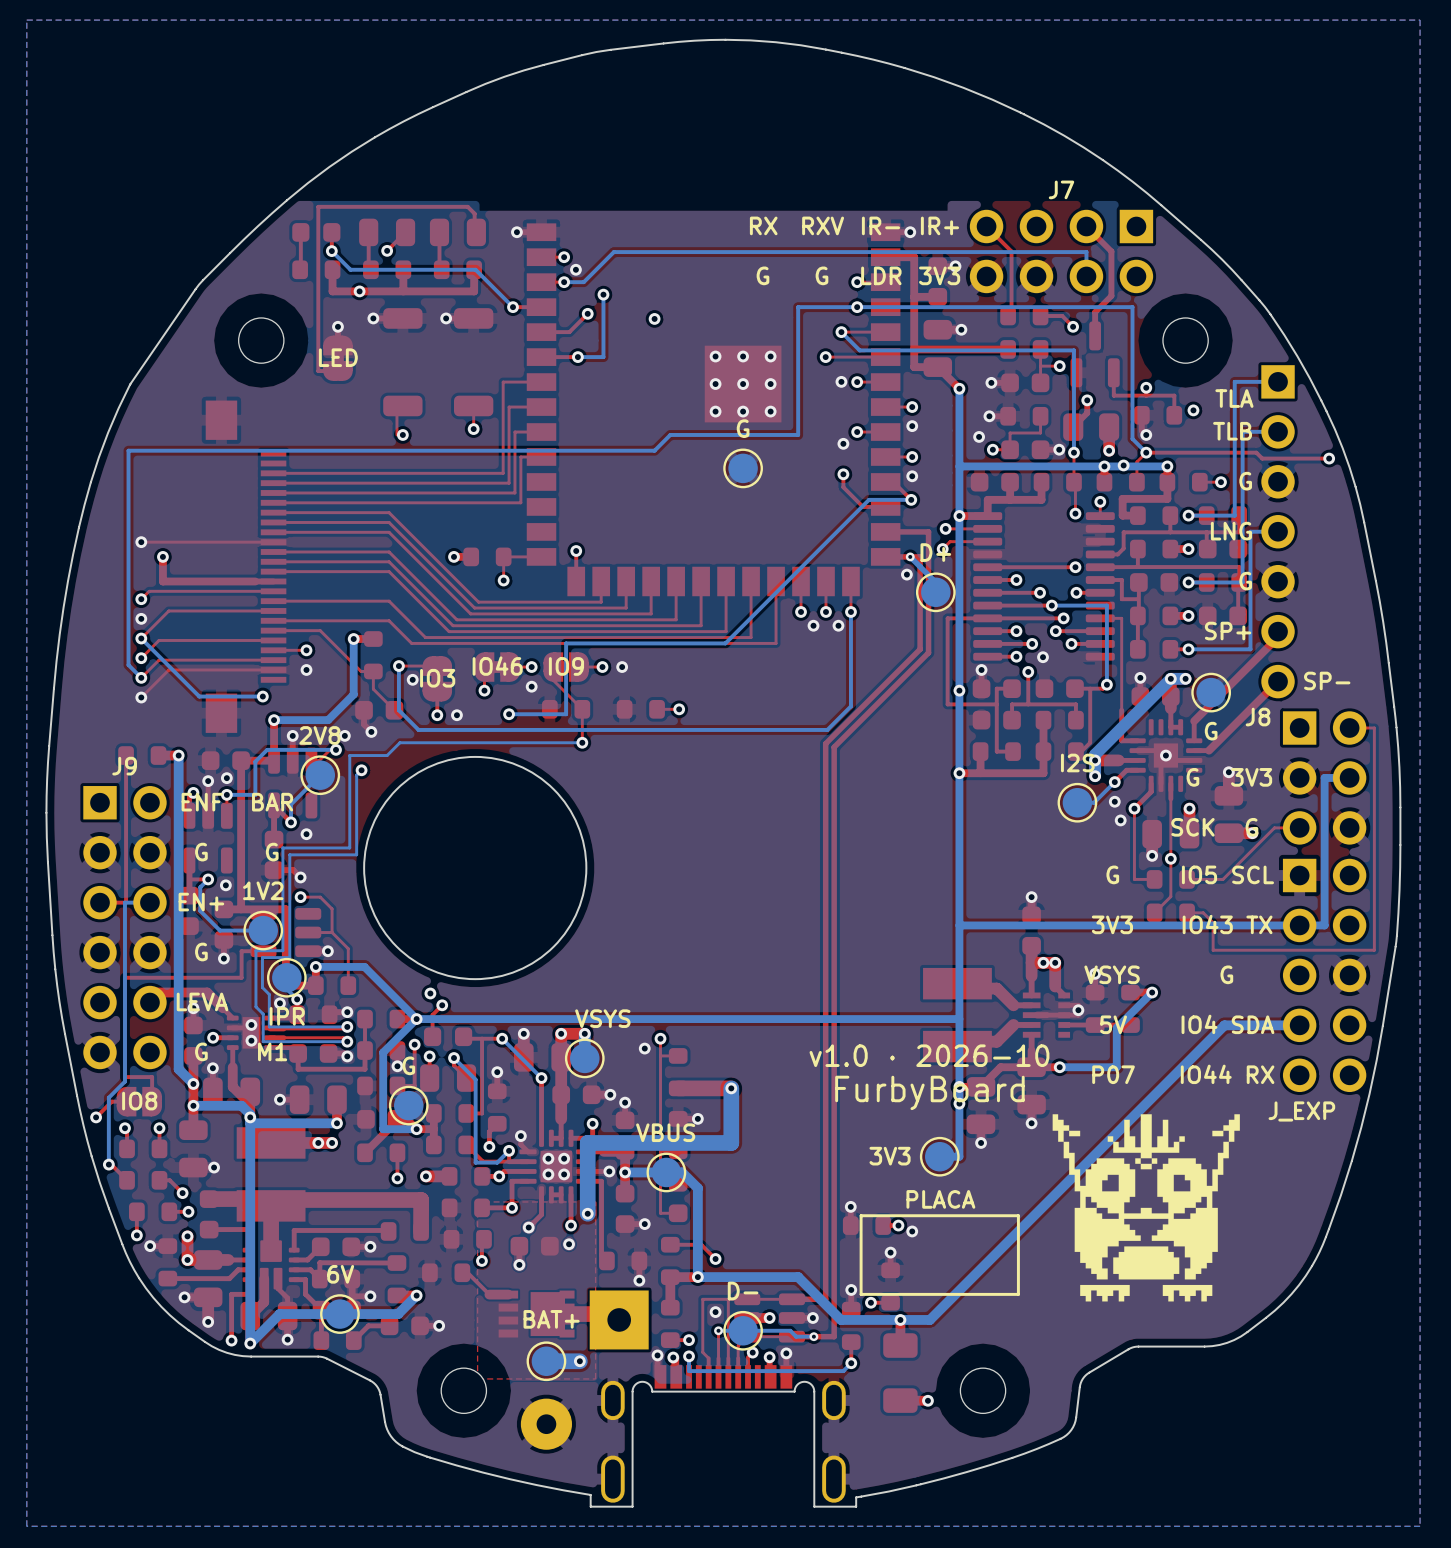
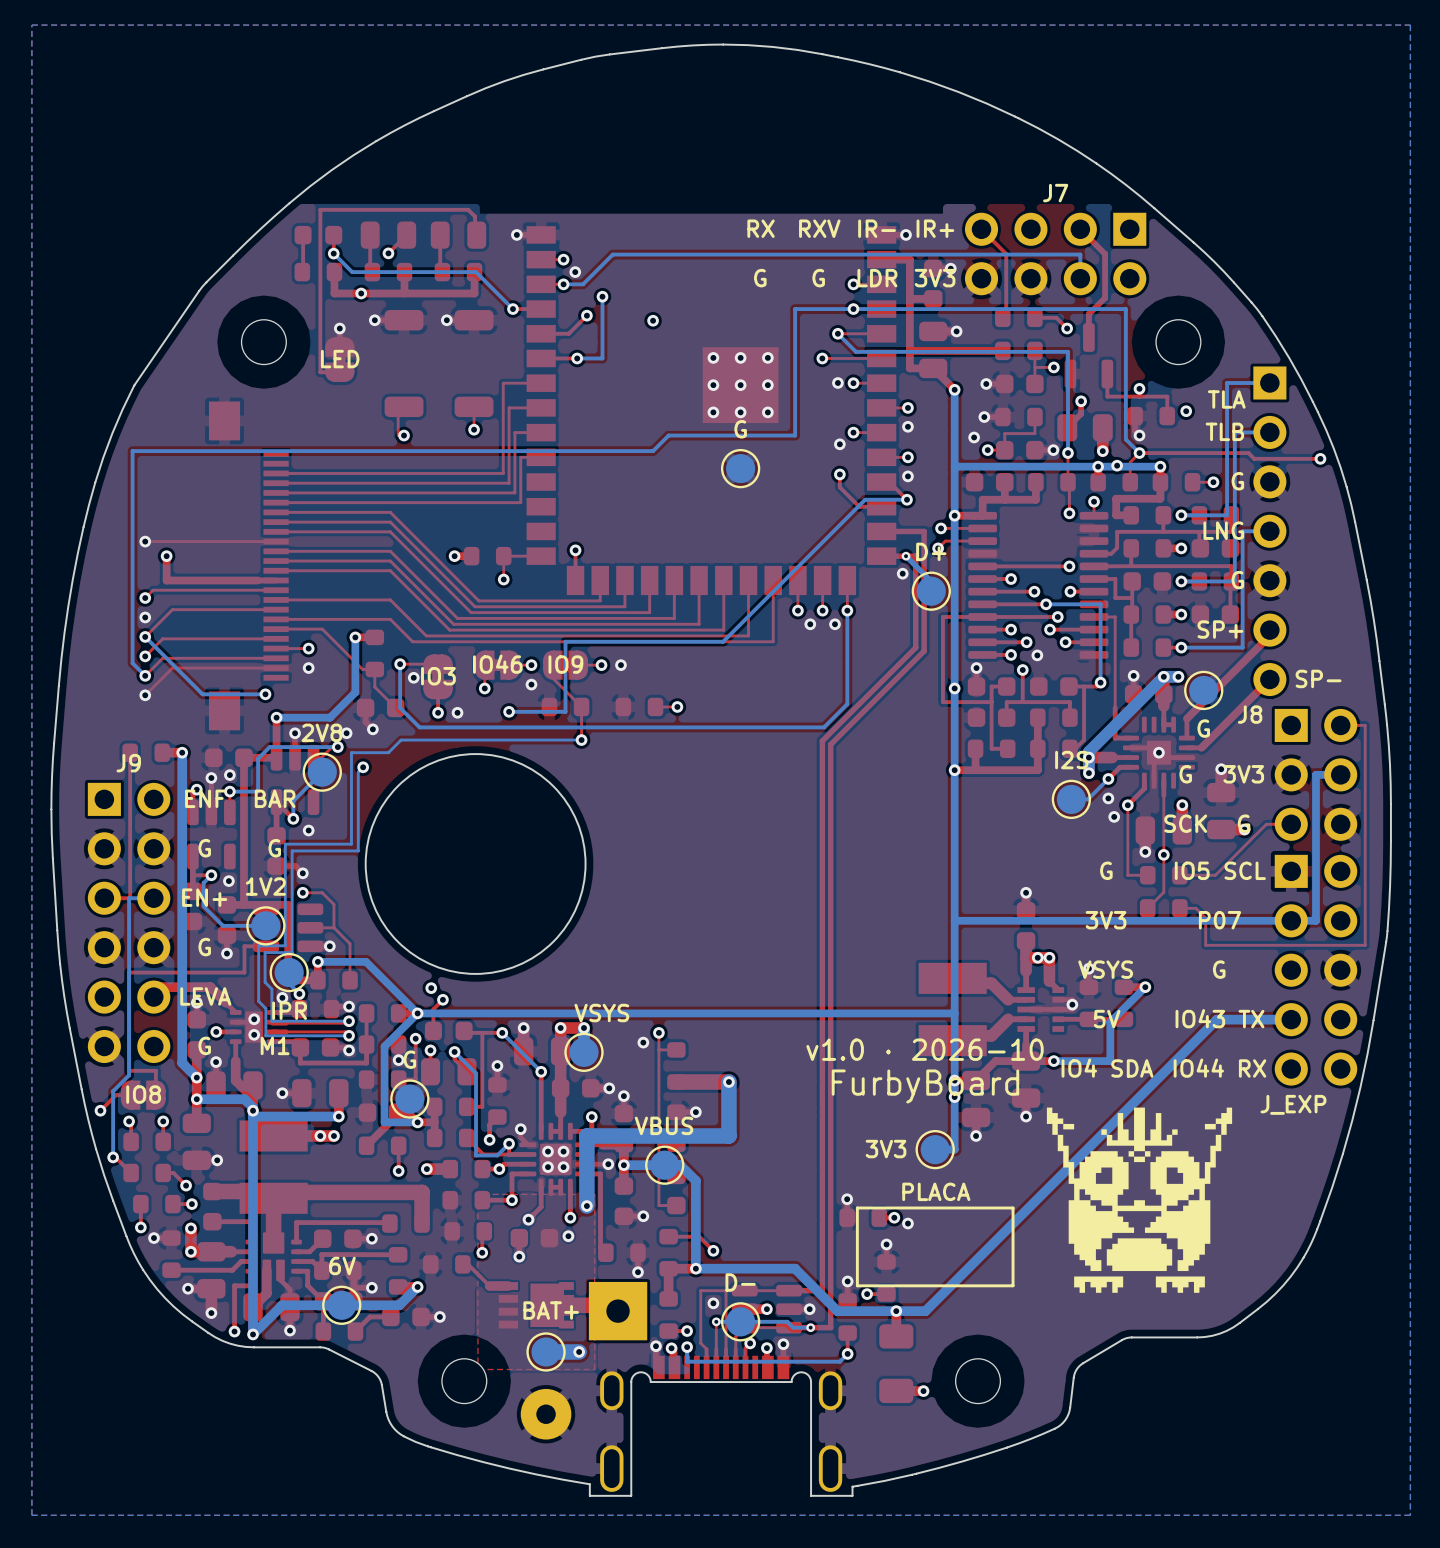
text: IO43 TX (1227, 924) -> P07 (1219, 920)
text: IO4 SDA (1227, 1024) -> IO43 TX (1219, 1018)
text: P07 (1113, 1074) -> IO4 SDA (1107, 1068)

